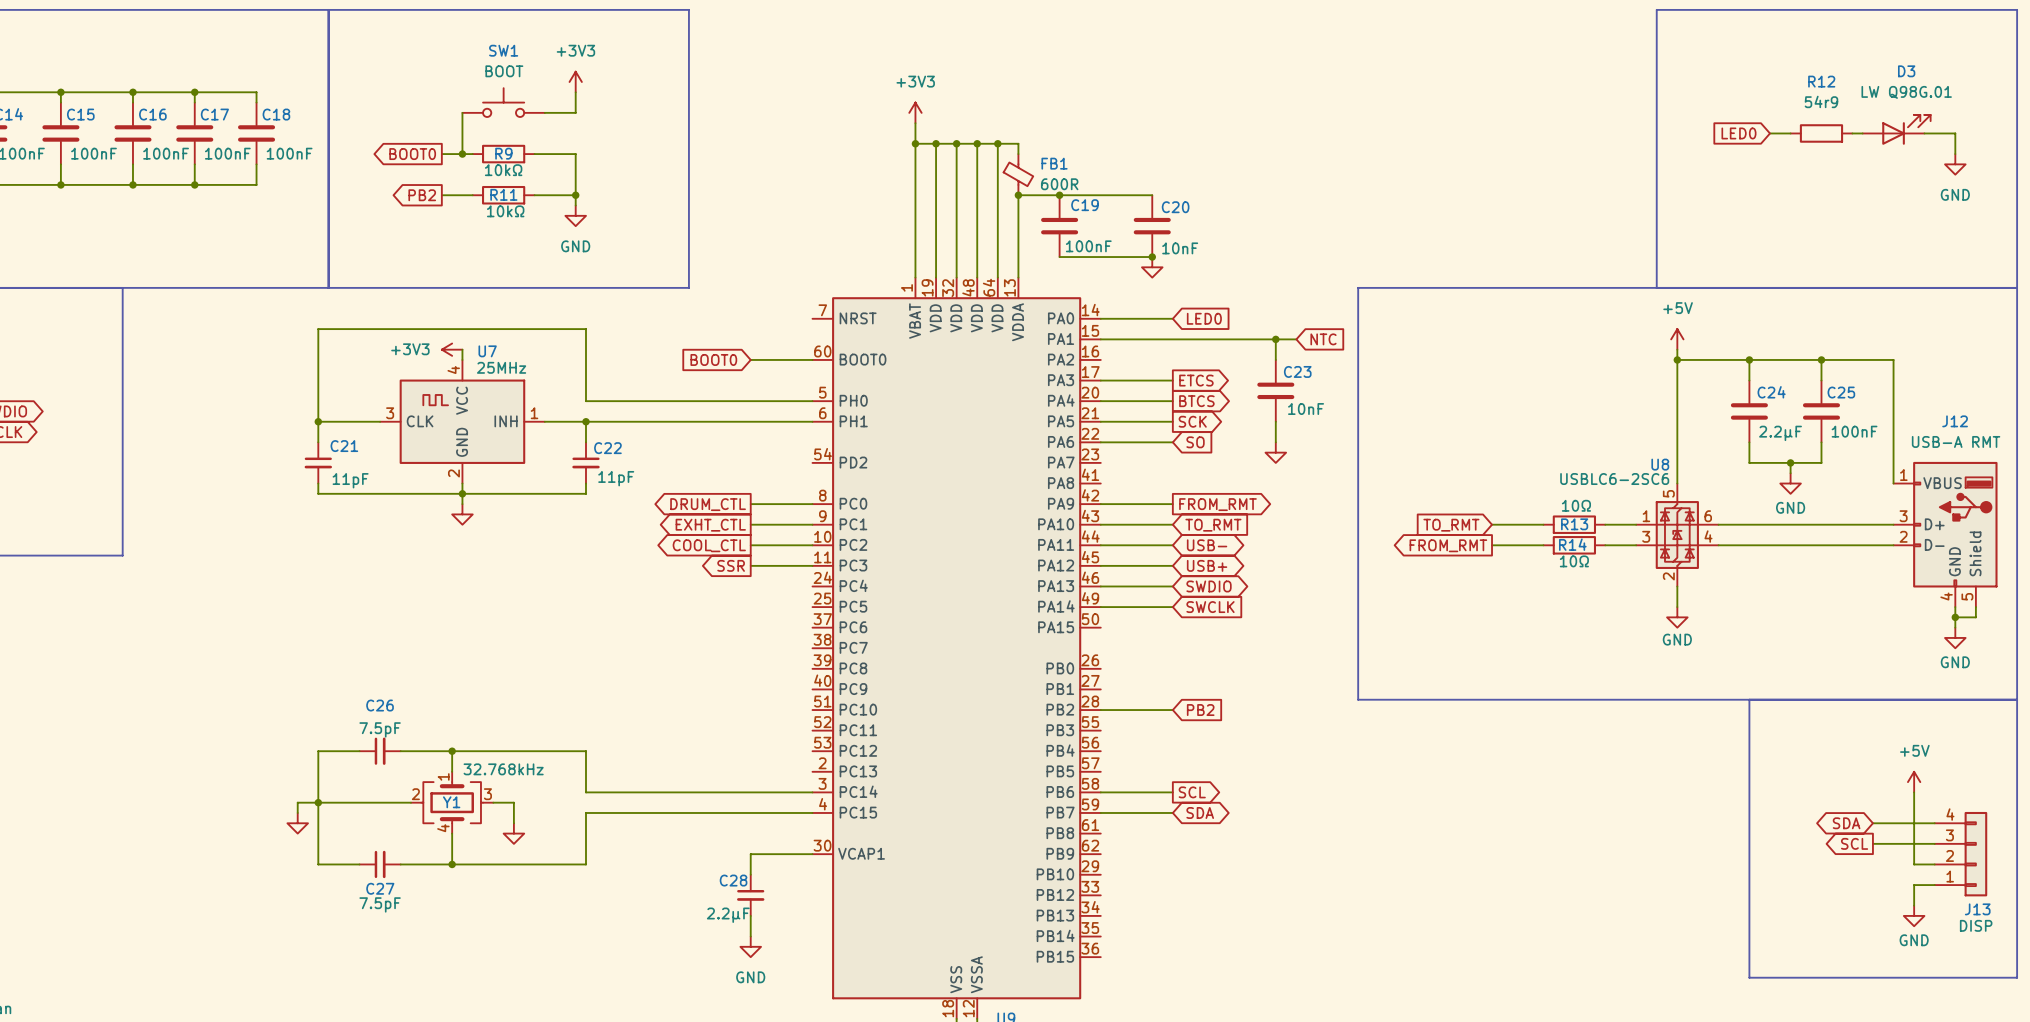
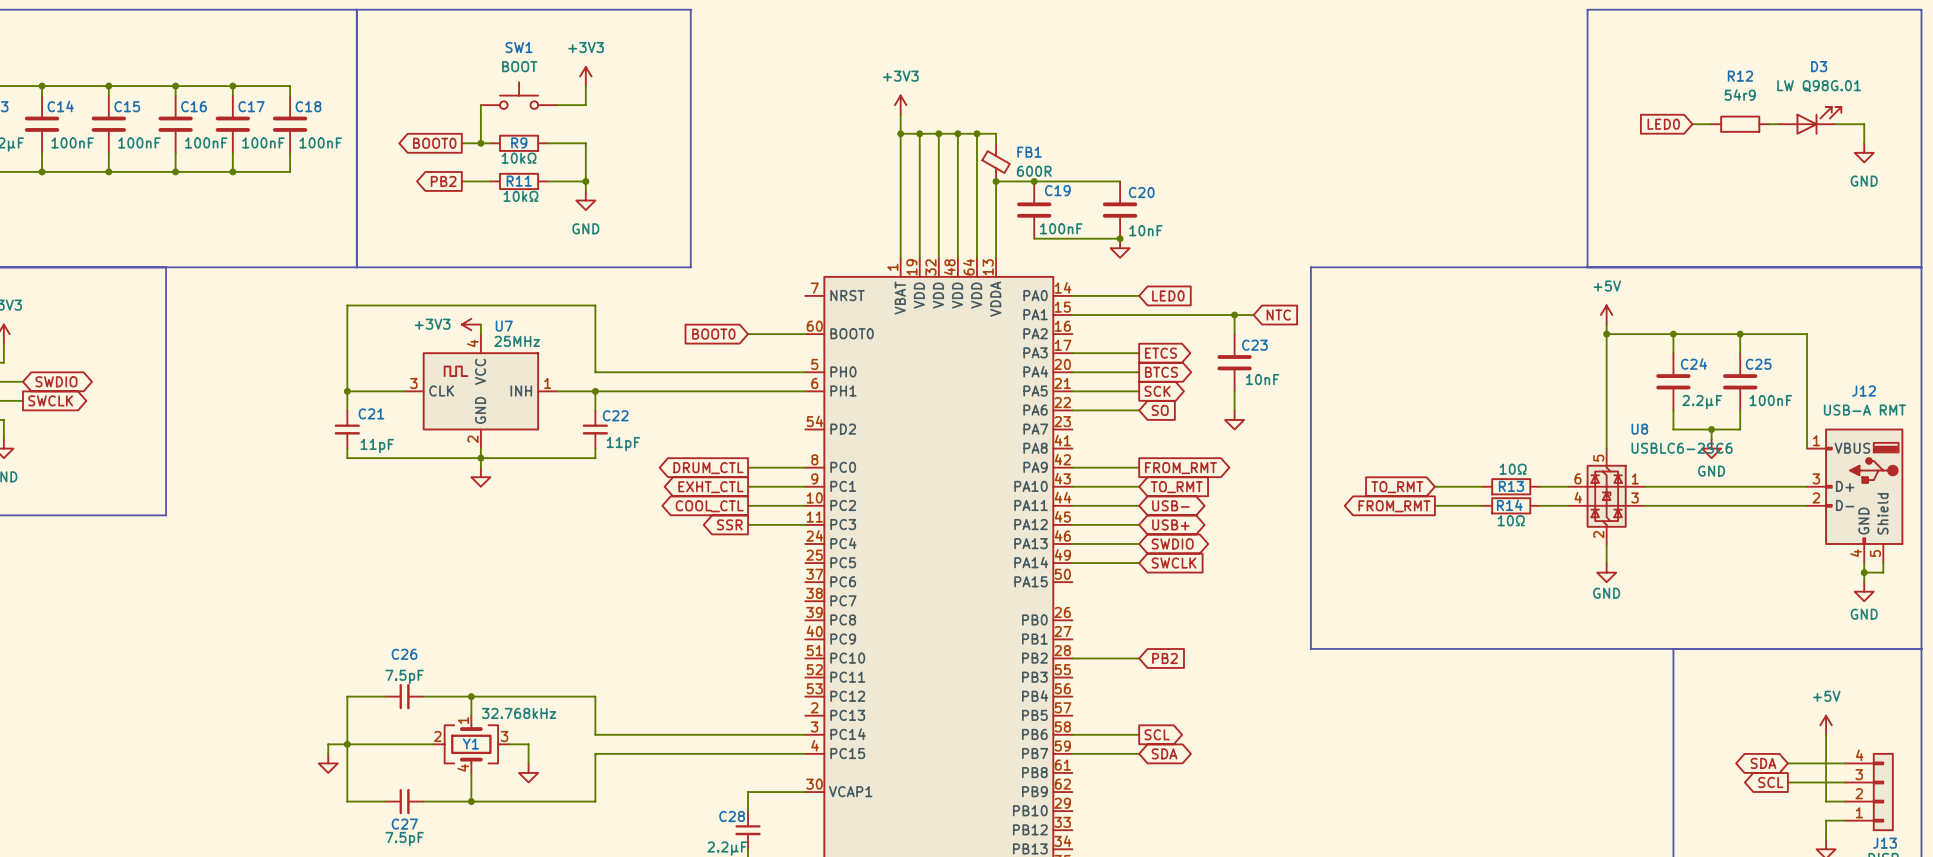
U8 name position: U8 (1660, 464) -> U8 (1639, 429)
U8 value position: USBLC6-2SC6 (1614, 479) -> USBLC6-2SC6 (1682, 448)
U8 flip: as is (1677, 535) -> left-right (1606, 496)

